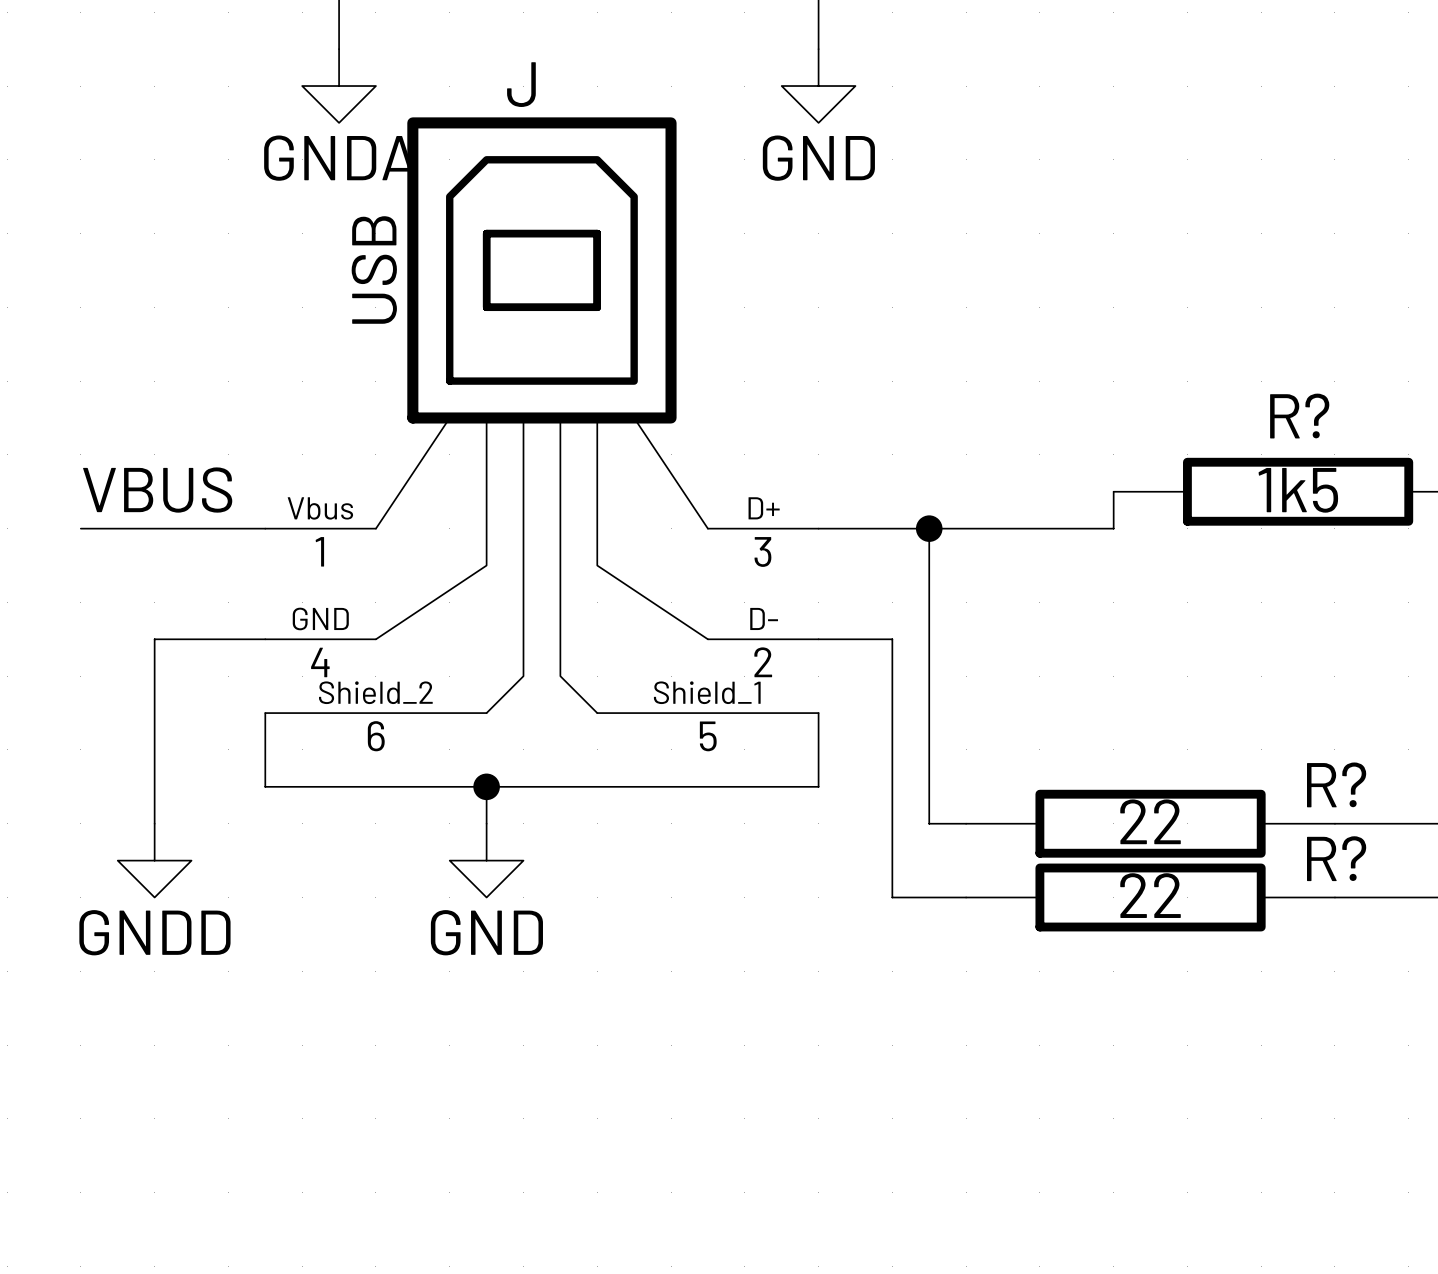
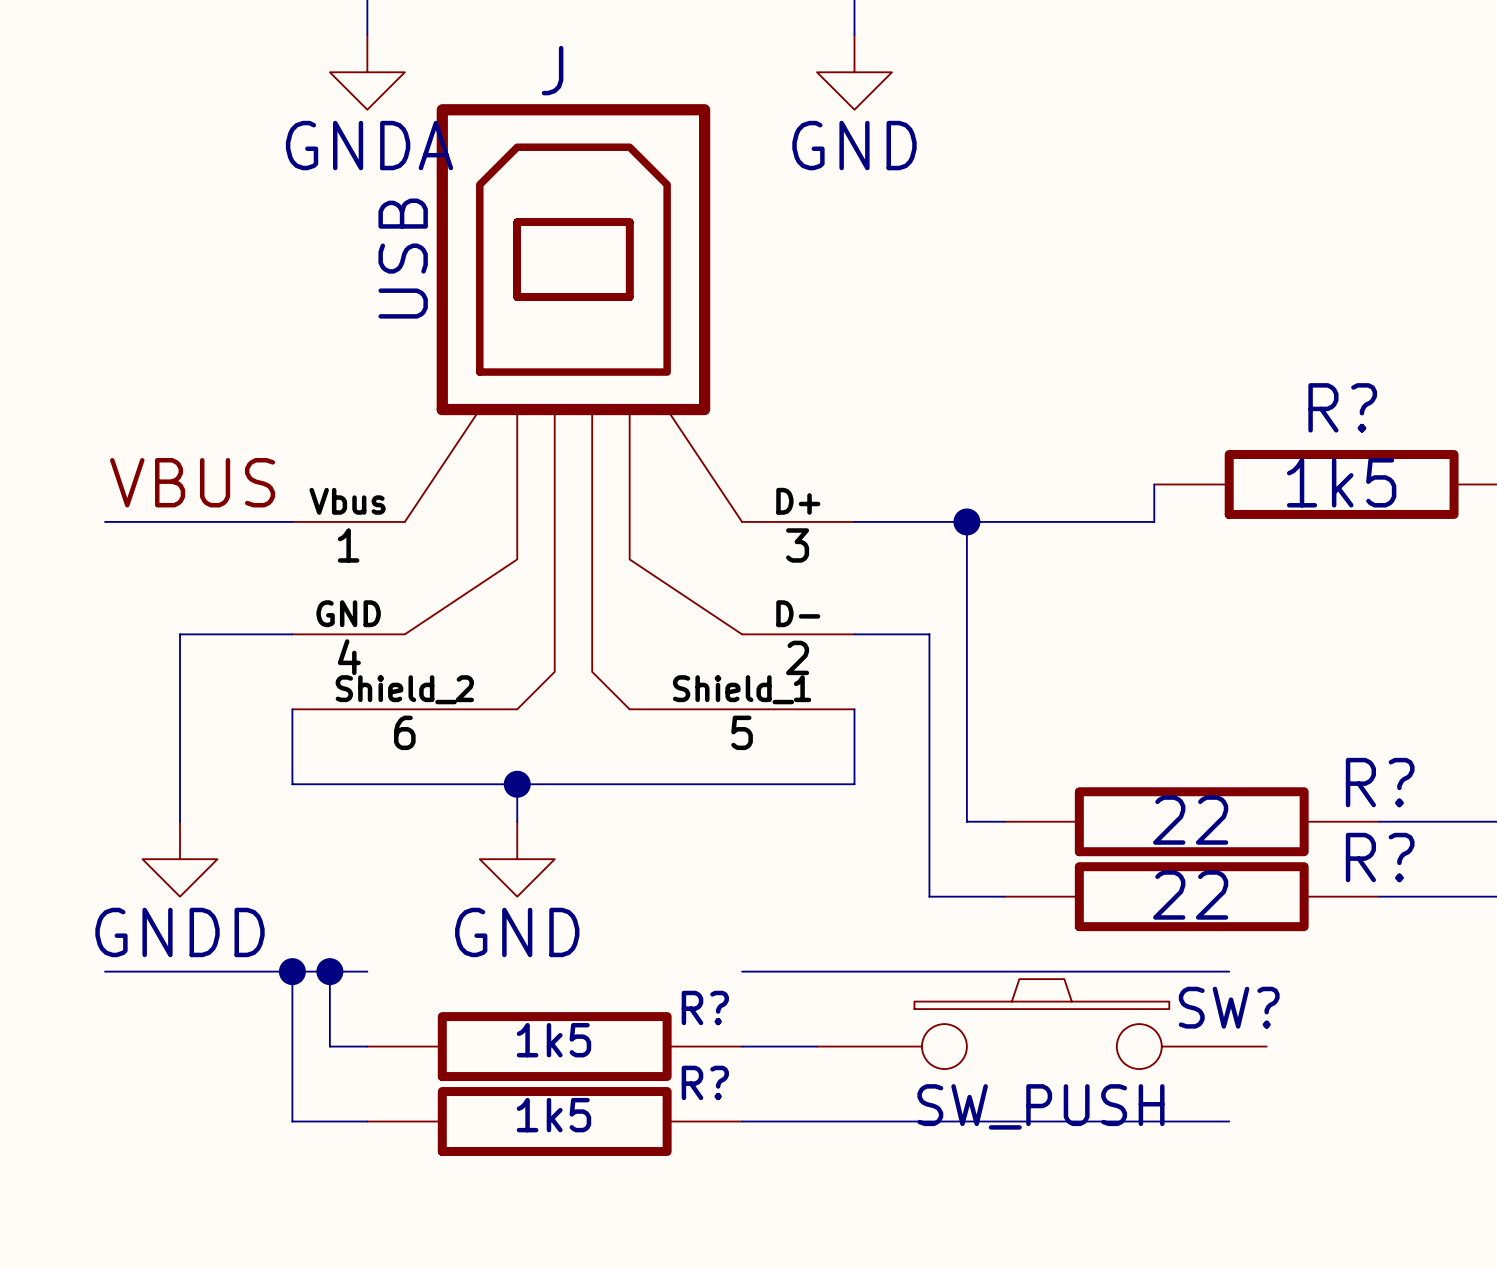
wire: none -> (105, 971) (367, 971)
wire: none -> (292, 971) (292, 1121) (367, 1121)
junction: none -> (292, 971)
wire: none -> (329, 971) (329, 1046) (367, 1046)
junction: none -> (329, 971)
wire: none -> (742, 971) (1229, 971)
SW?: none -> SW_PUSH (1041, 1024)
R?: none -> 1k5 (554, 1046)
wire: none -> (742, 1046) (817, 1046)
R?: none -> 1k5 (554, 1121)
wire: none -> (742, 1121) (1229, 1121)

